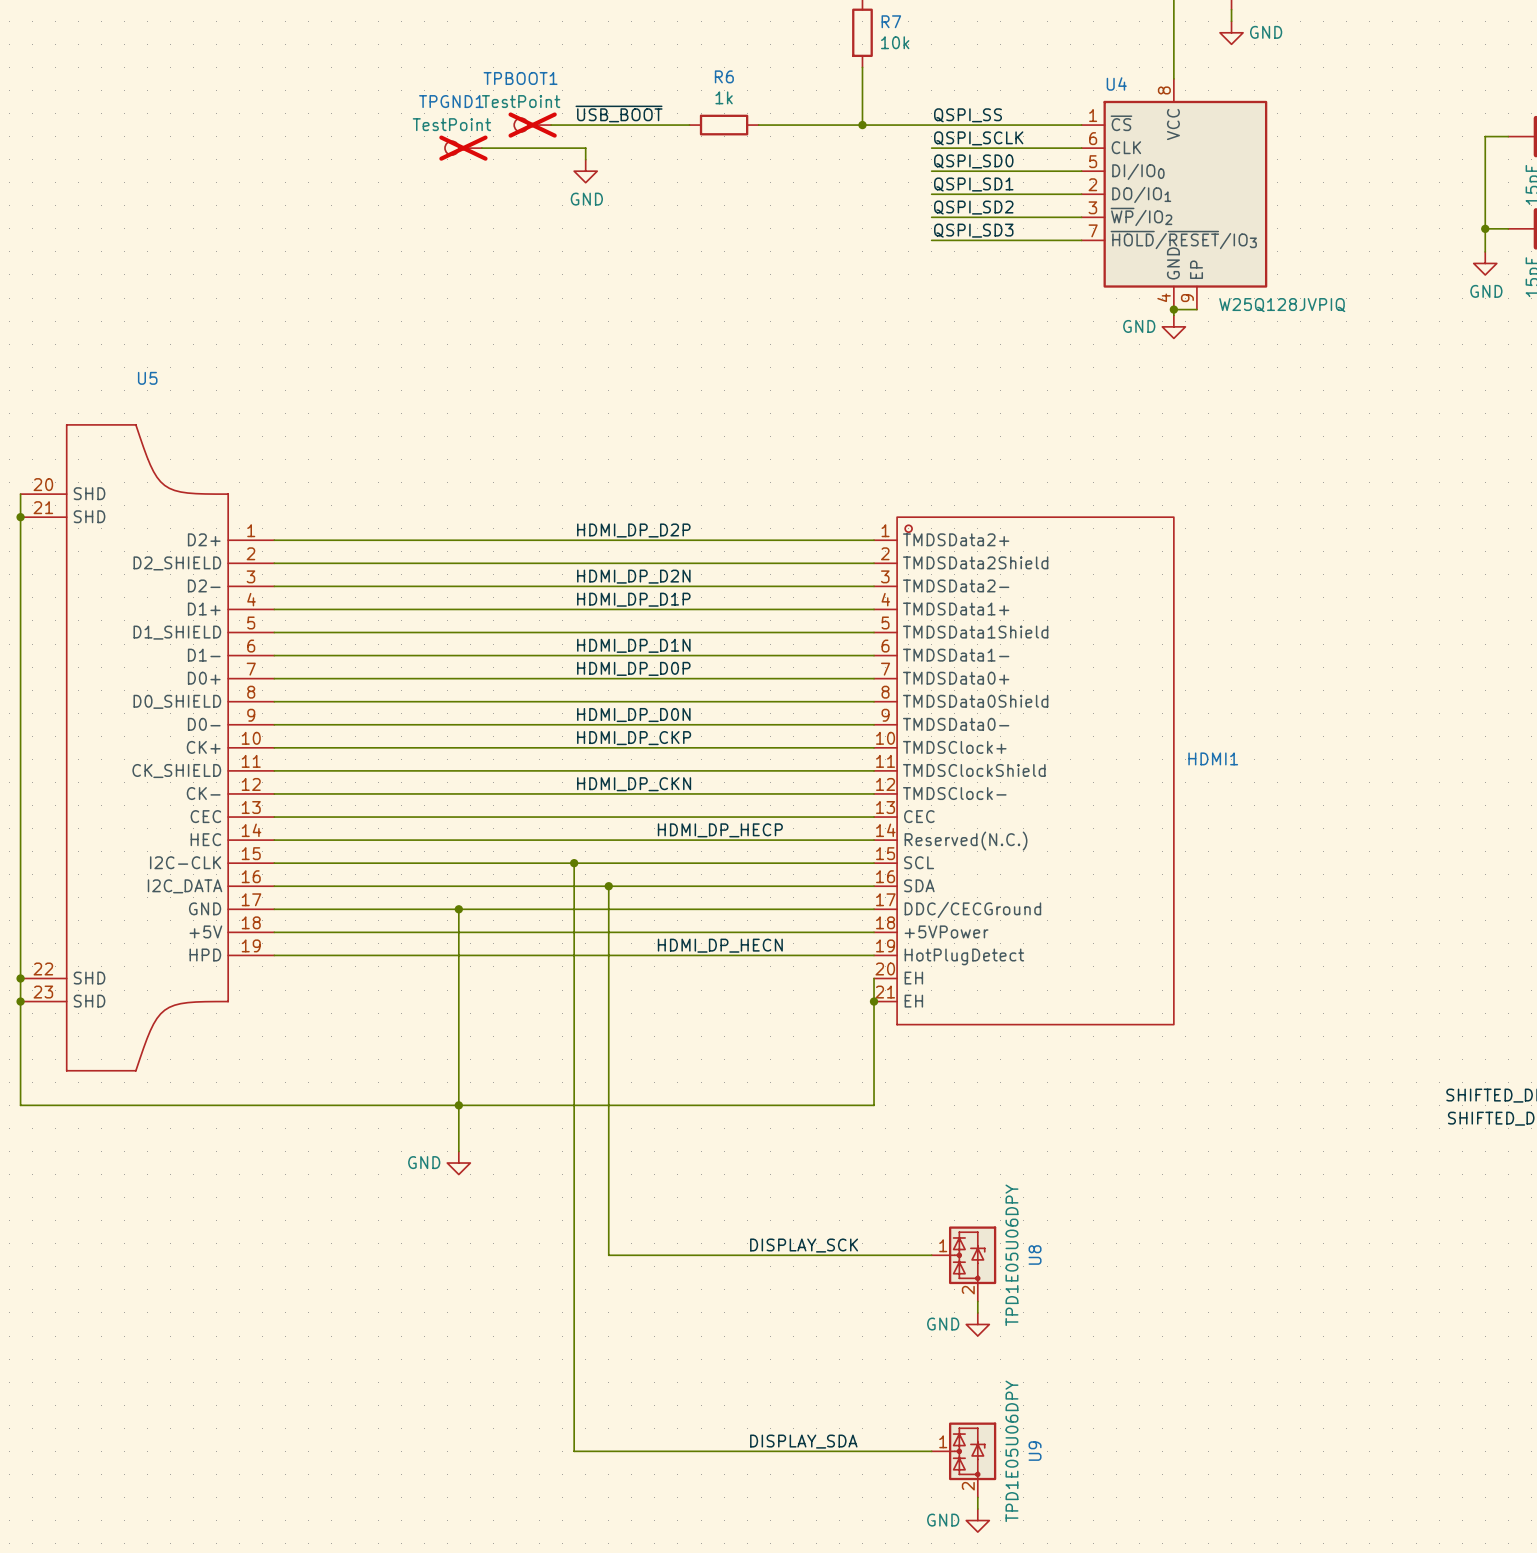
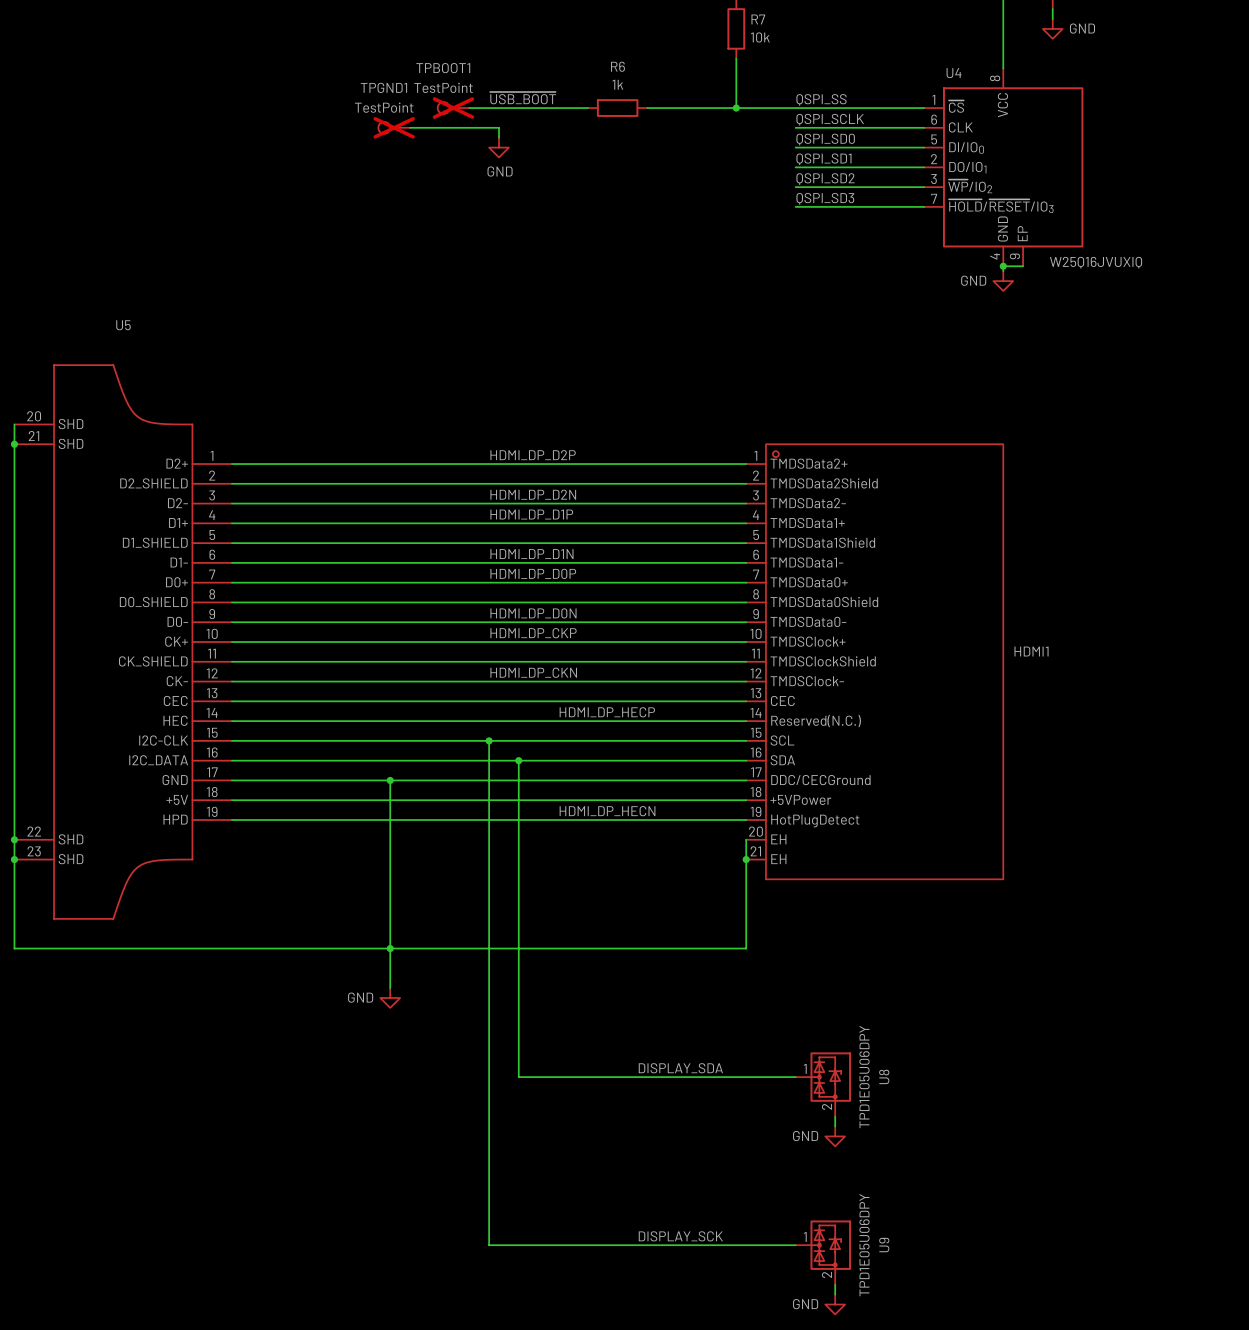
U4 value: W25Q128JVPIQ (1282, 305) -> W25Q16JVUXIQ (1096, 262)
label: DISPLAY_SCK (804, 1245) -> DISPLAY_SDA (680, 1068)
label: DISPLAY_SDA (803, 1441) -> DISPLAY_SCK (680, 1236)

